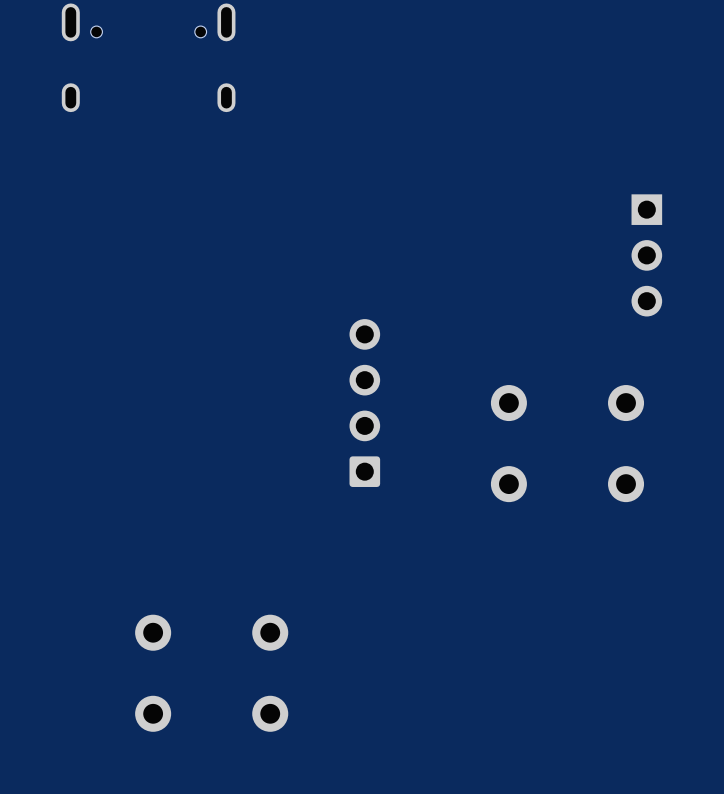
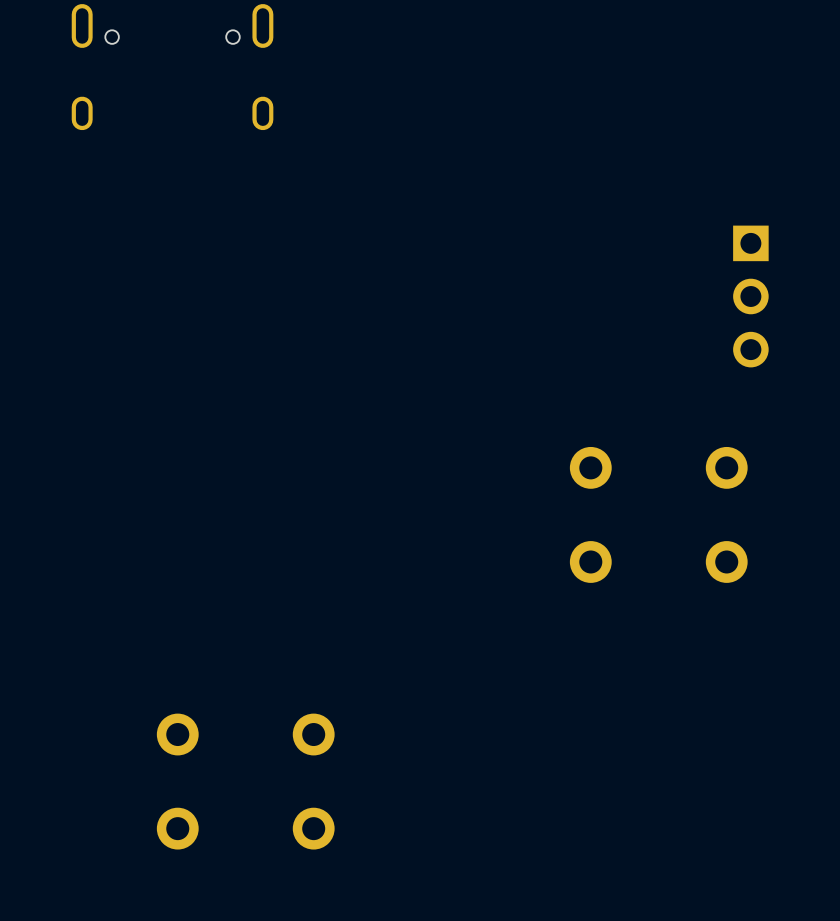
part: (364, 403) -> none

